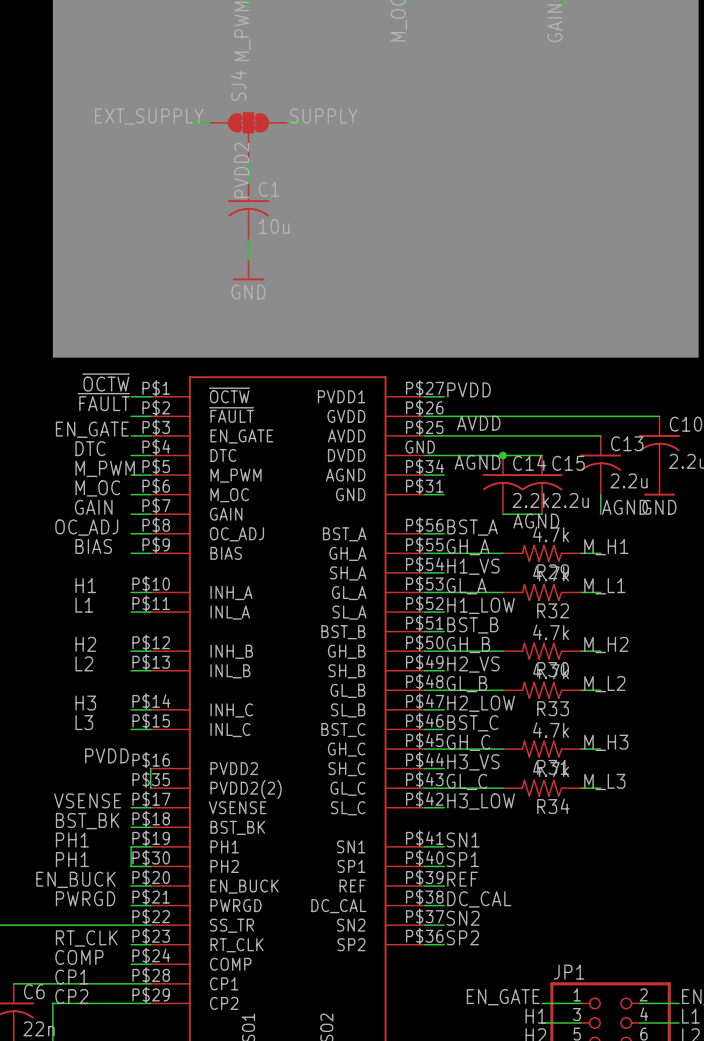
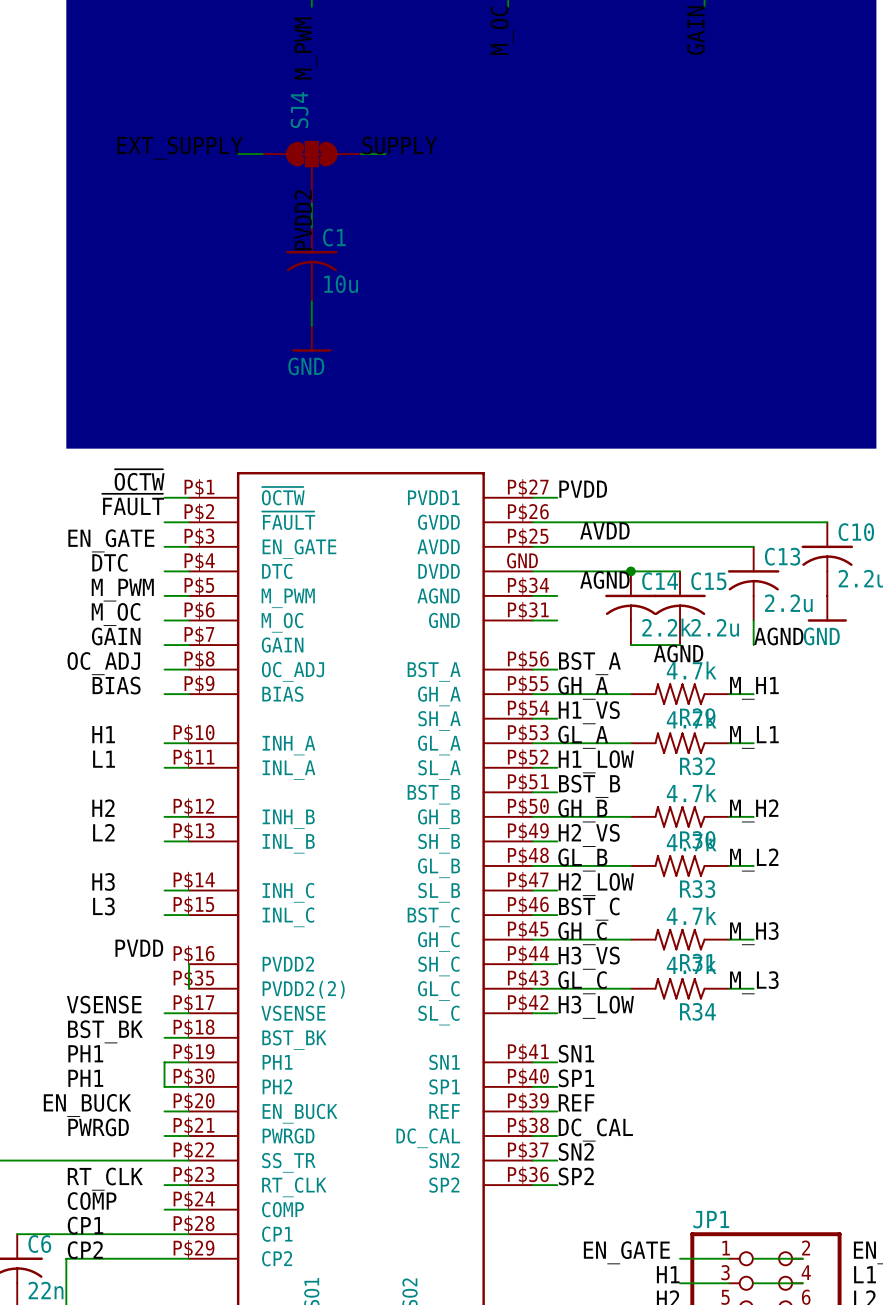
wire: (639, 1003) (679, 1003) -> (802, 1258) (753, 1258)
wire: (639, 1022) (679, 1022) -> (802, 1283) (753, 1283)

